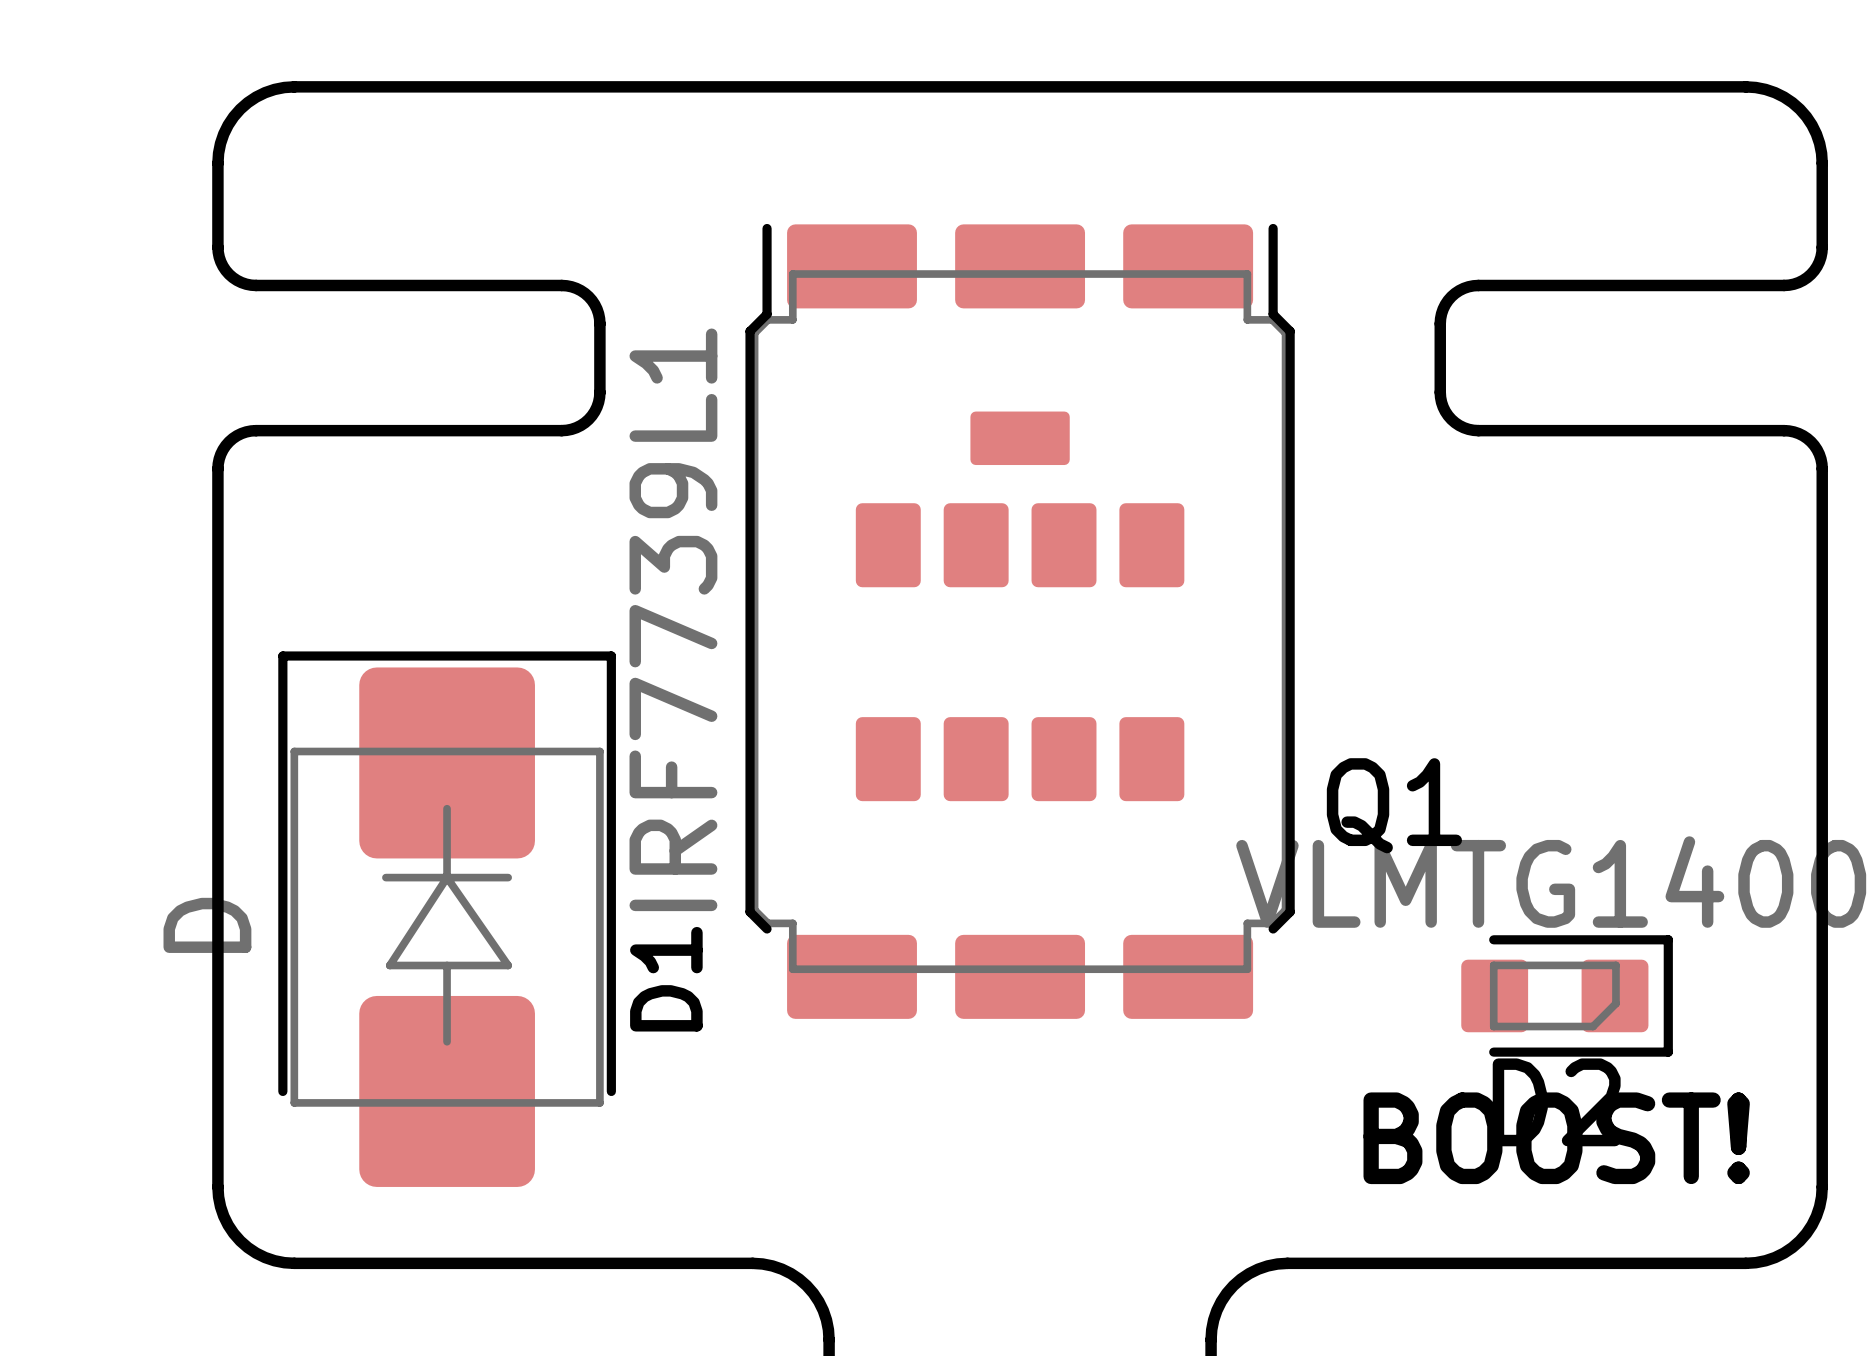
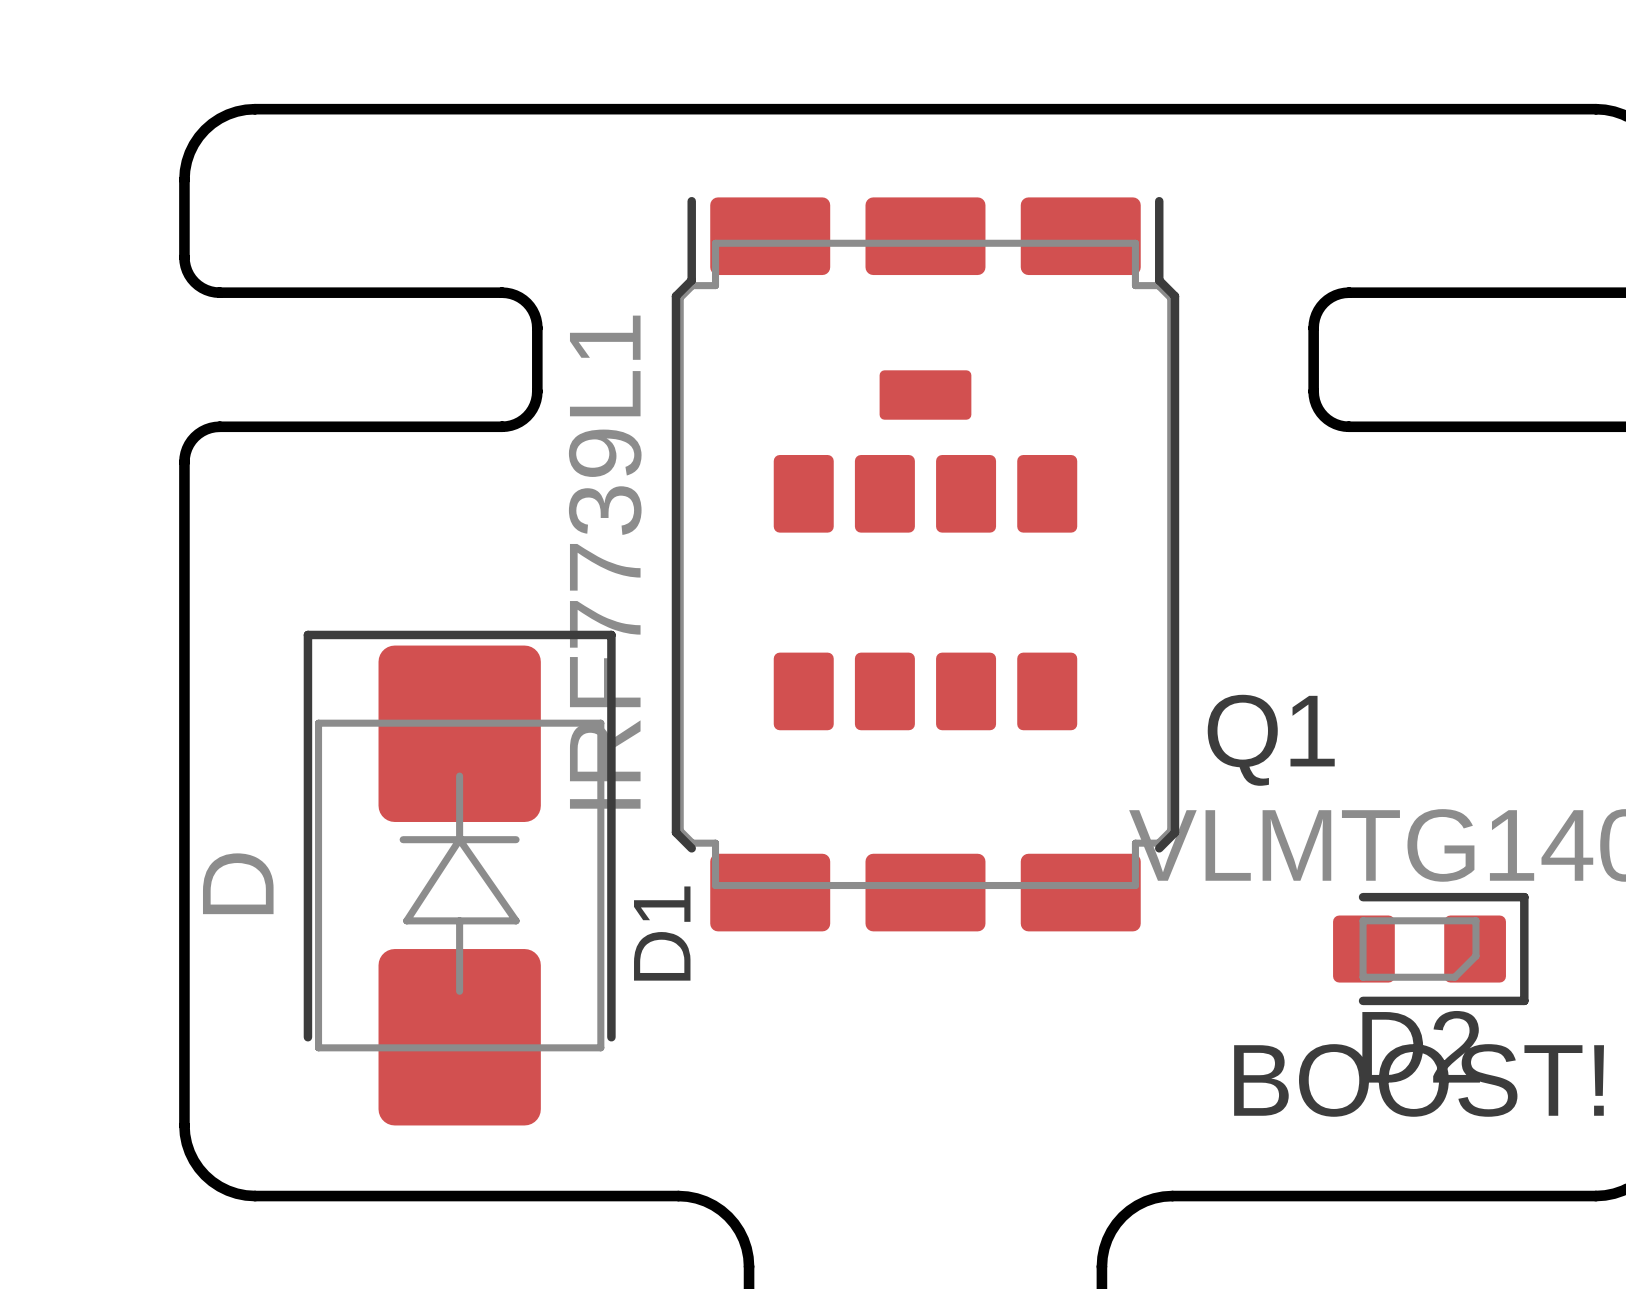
Q1 position: (1020, 621) -> (925, 564)
D1 position: (447, 919) -> (459, 878)

